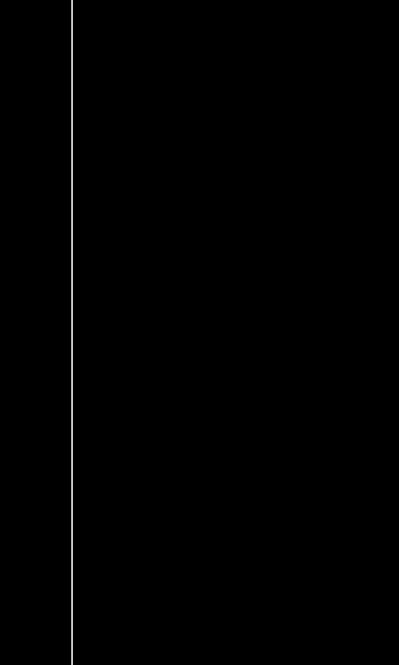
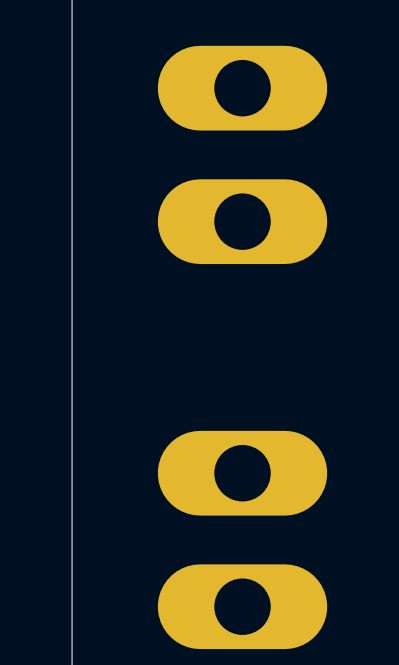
part: none -> (242, 154)
part: none -> (242, 539)

